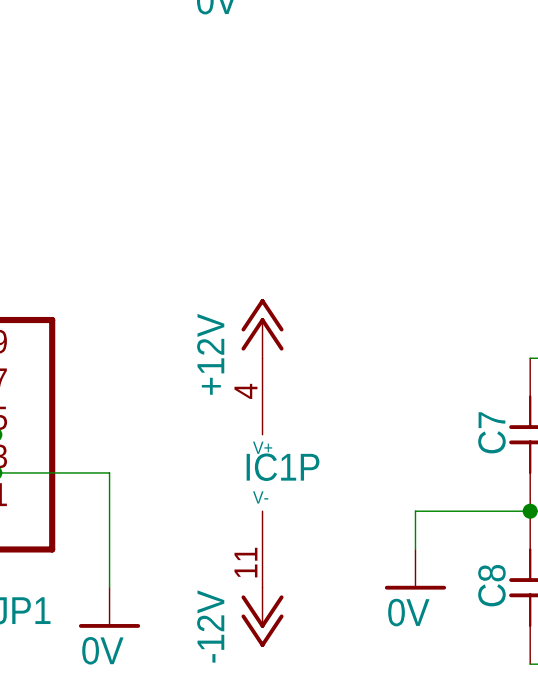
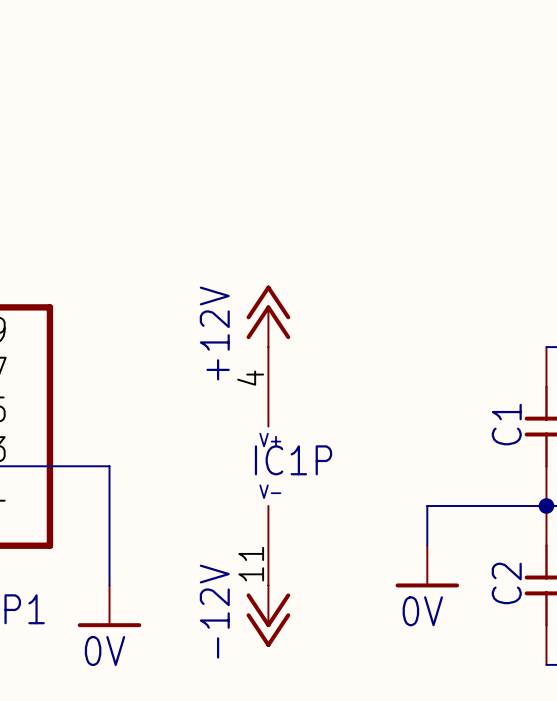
C7 name: C7 (491, 432) -> C1 (506, 424)
C8 name: C8 (491, 585) -> C2 (506, 583)

